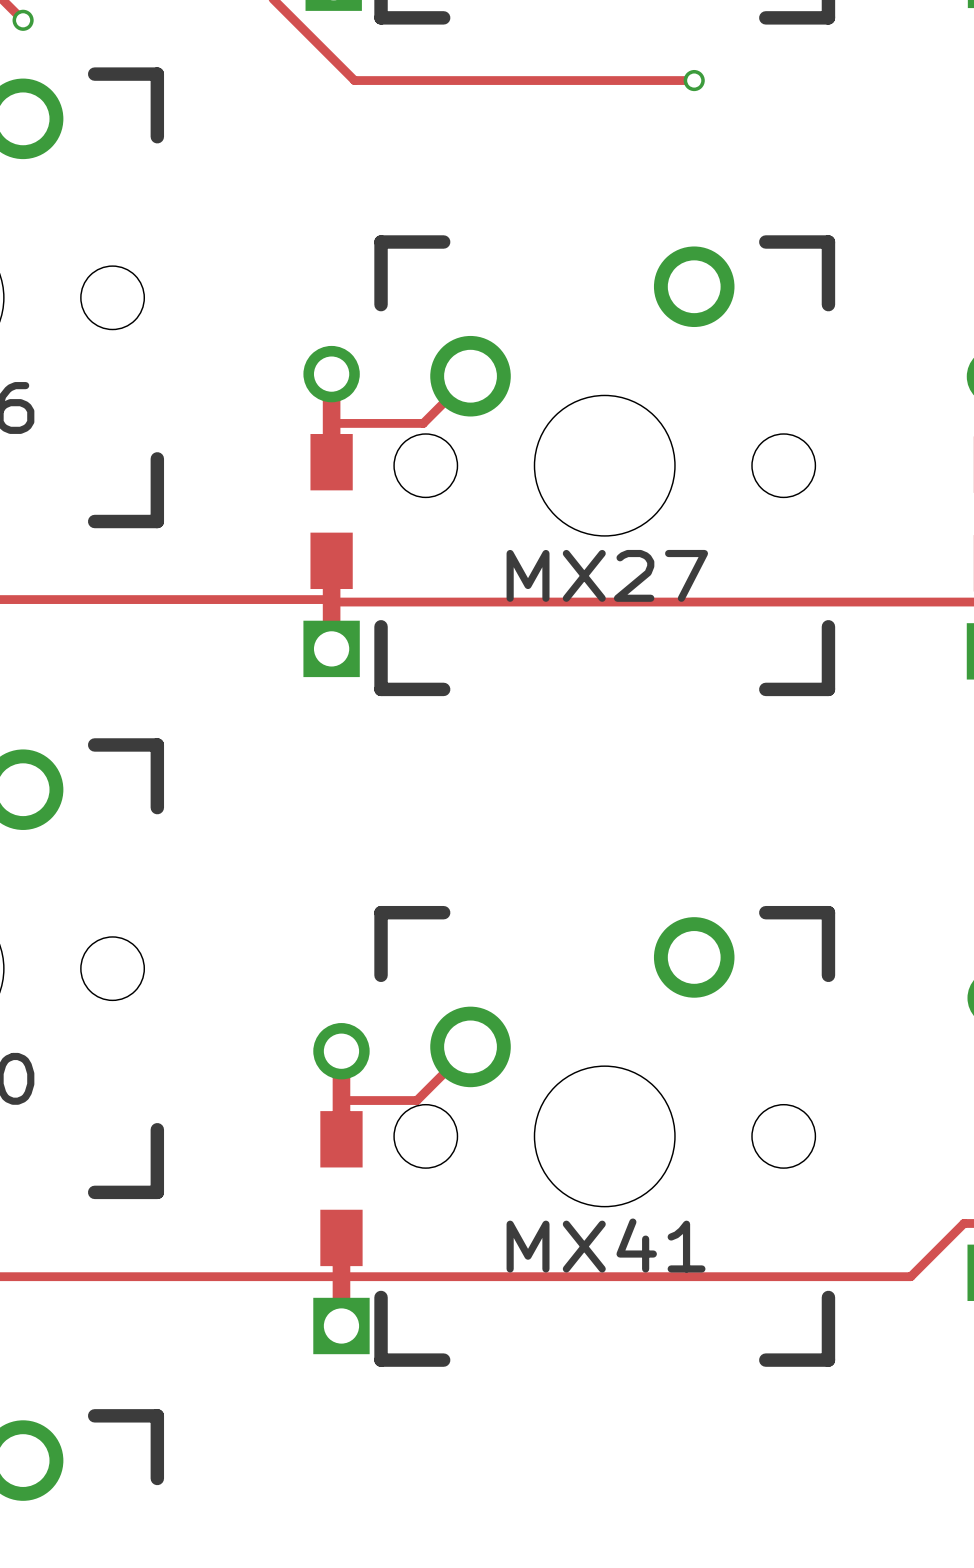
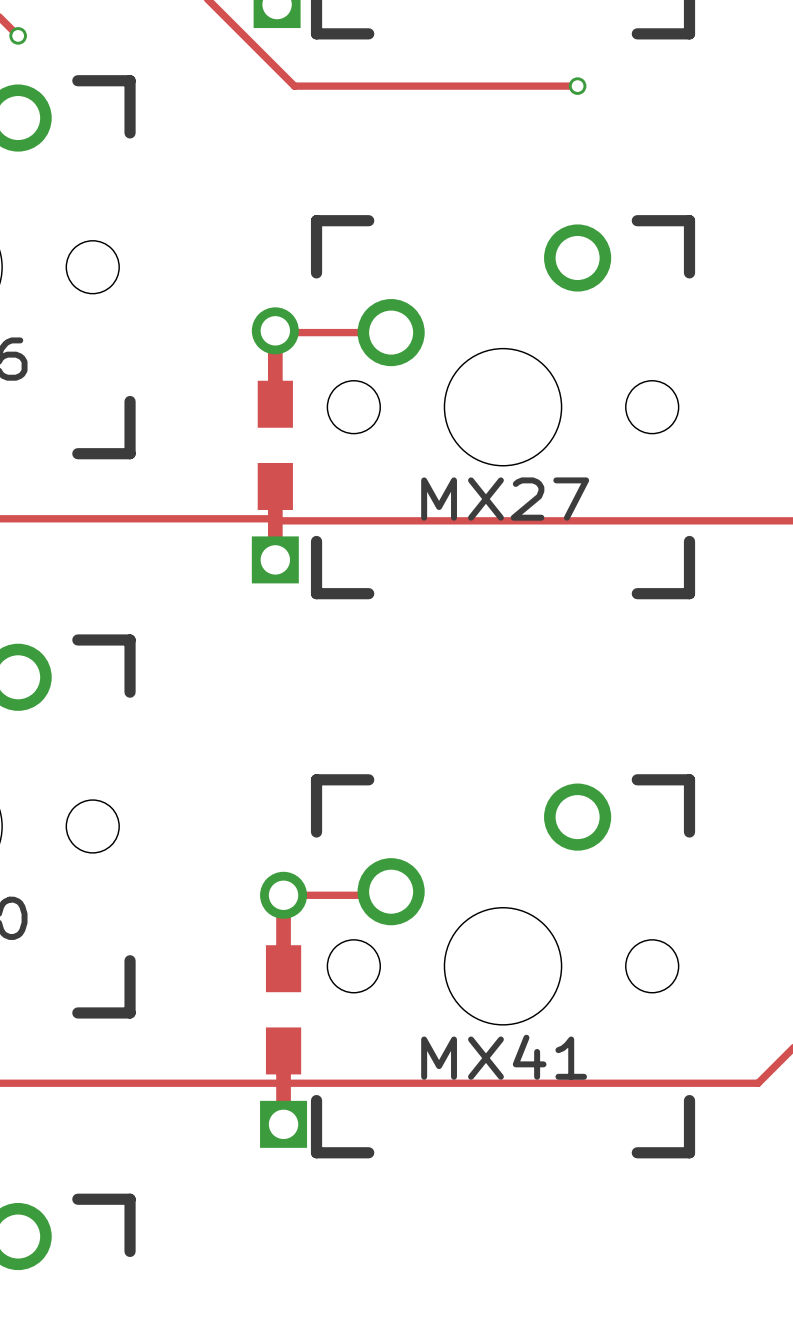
track: (470, 376) (423, 423) (331, 423) -> (391, 332) (277, 332) (275, 330)
track: (466, 1051) (416, 1100) (341, 1100) -> (387, 895) (283, 895)

